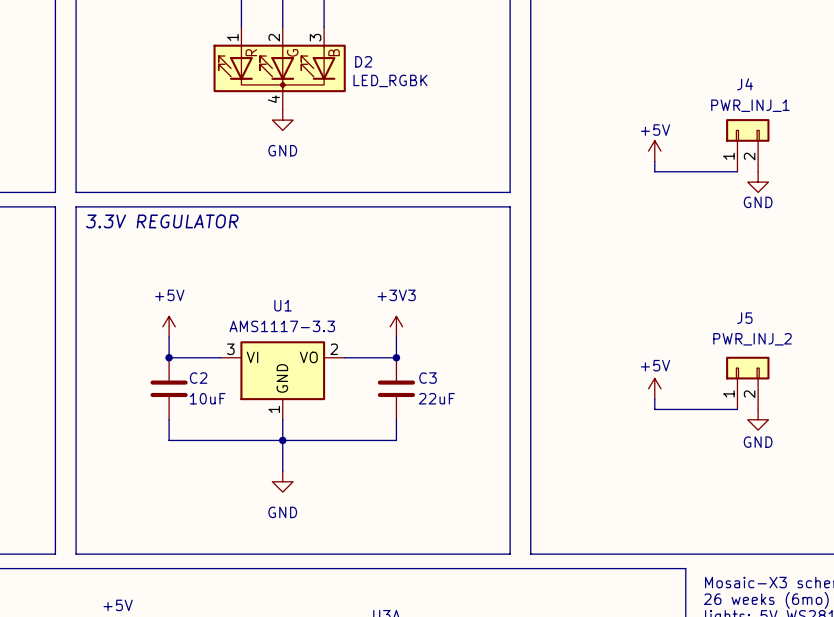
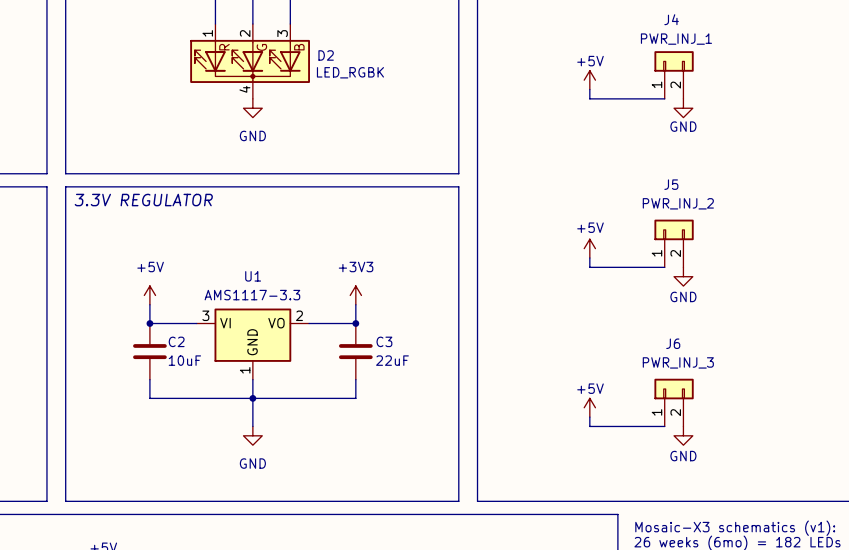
power symbol: none -> +5V (589, 80)
power symbol: none -> GND (683, 108)
J4 position: (747, 145) -> (674, 75)
power symbol: +5V (654, 151) -> none
wire: (654, 161) (654, 171) (737, 171) -> (589, 89) (589, 98) (664, 98)
power symbol: GND (758, 182) -> none
power symbol: none -> +5V (589, 248)
wire: none -> (589, 257) (589, 267) (664, 267)
power symbol: none -> GND (683, 276)
J5 position: (747, 383) -> (674, 243)
power symbol: +5V (654, 388) -> none
wire: (654, 399) (654, 409) (737, 409) -> (589, 417) (589, 426) (664, 426)
power symbol: GND (758, 419) -> none
J6: none -> PWR_INJ_3 (674, 402)
power symbol: none -> +5V (589, 407)
power symbol: none -> GND (683, 435)

